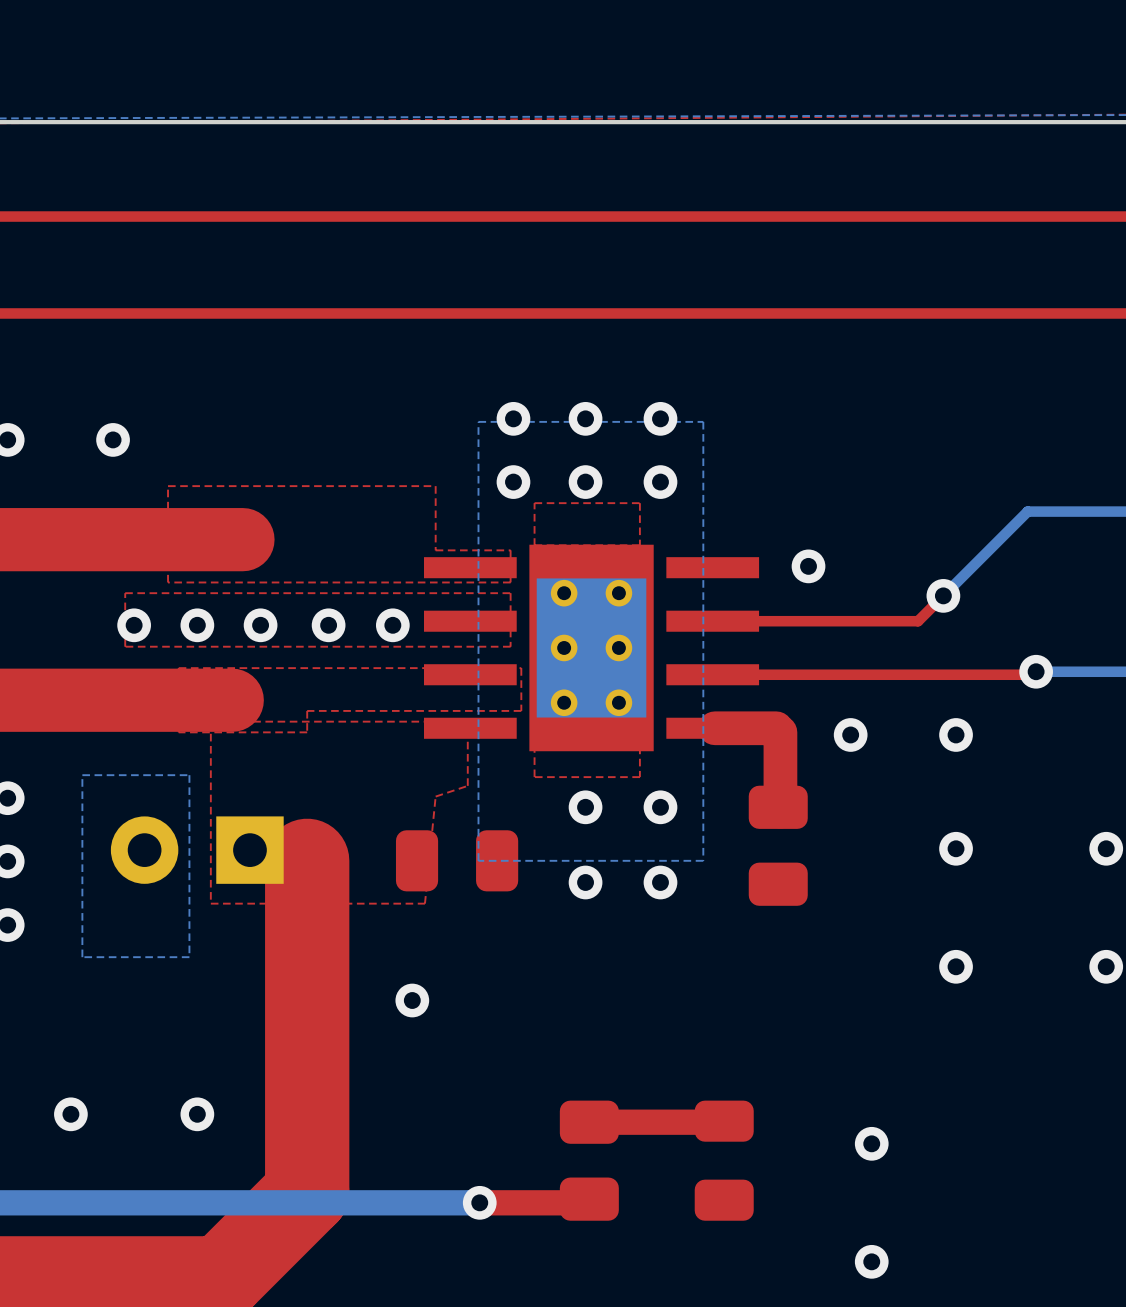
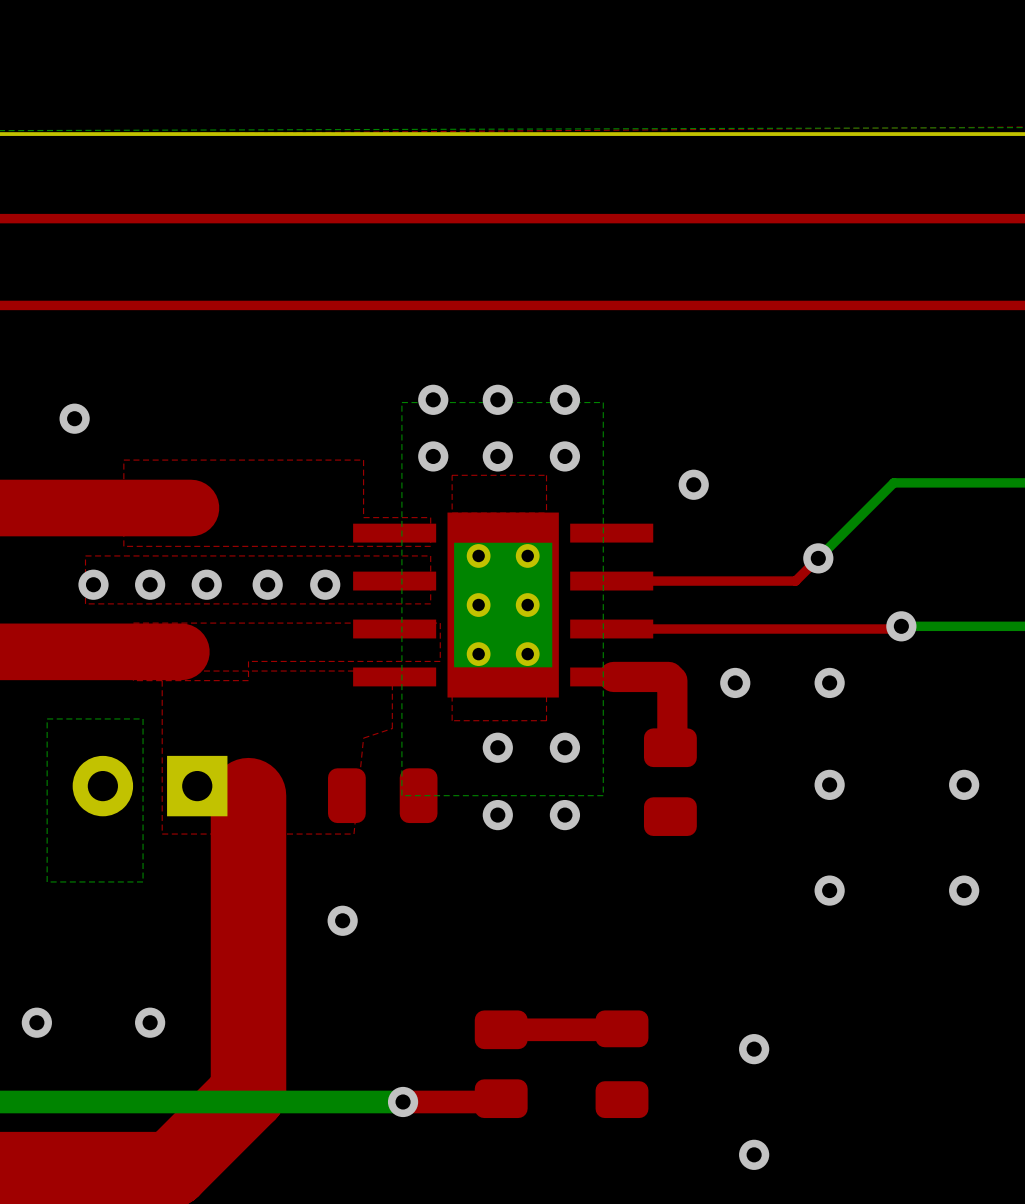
via position: (808, 566) -> (693, 484)

